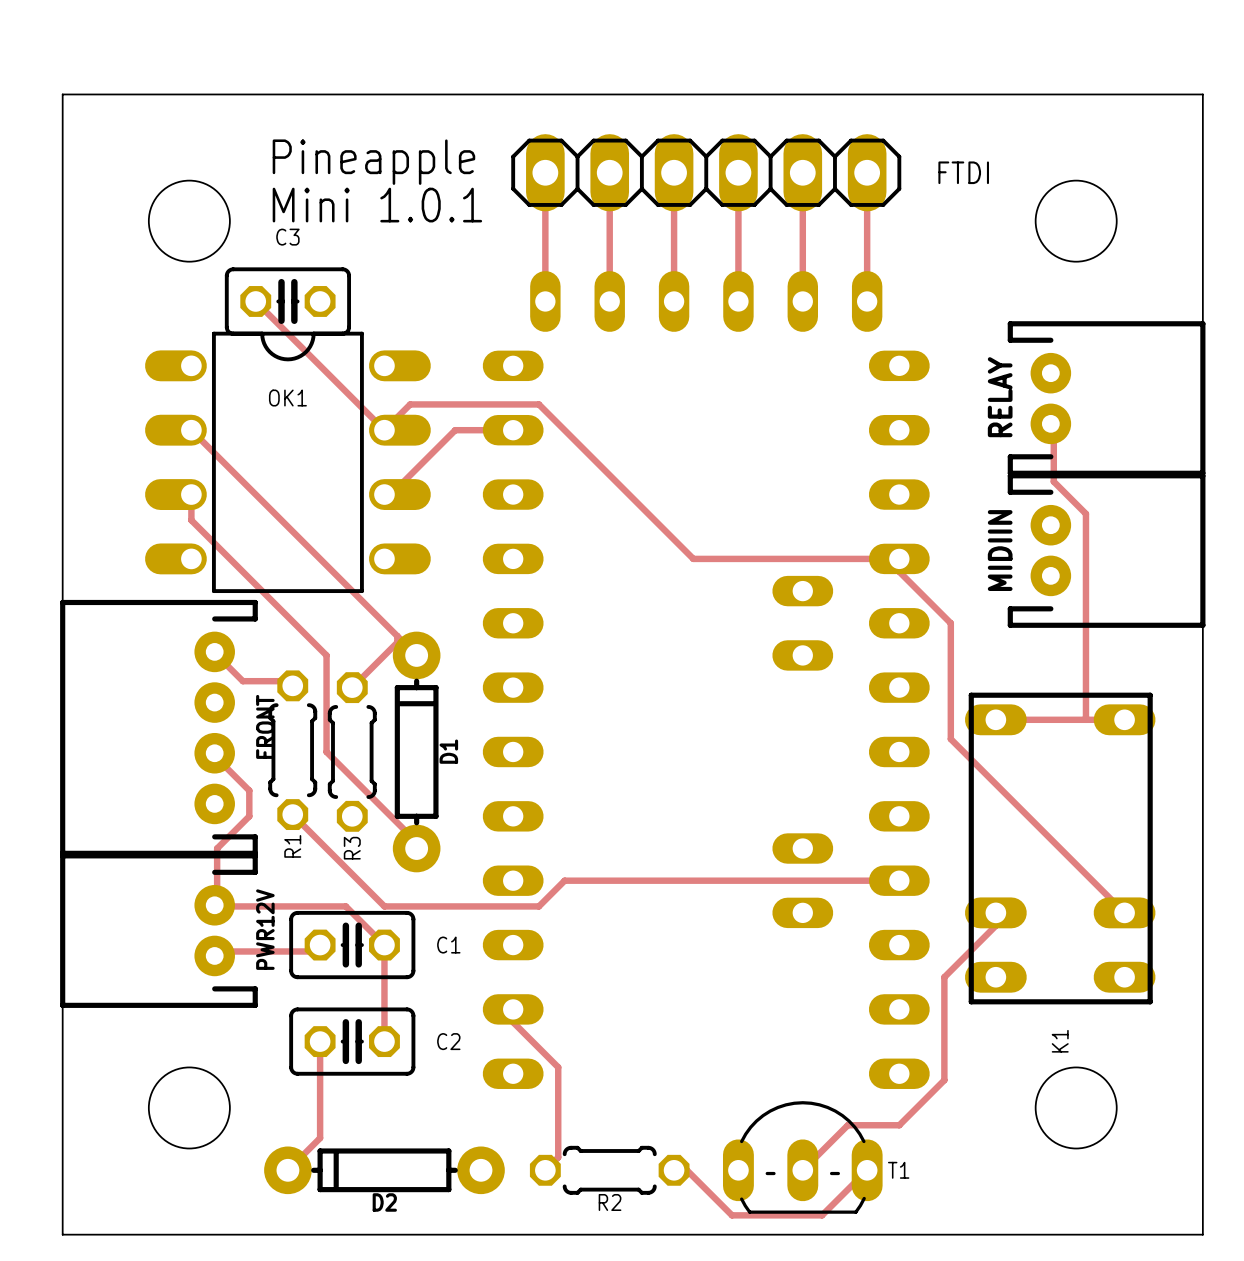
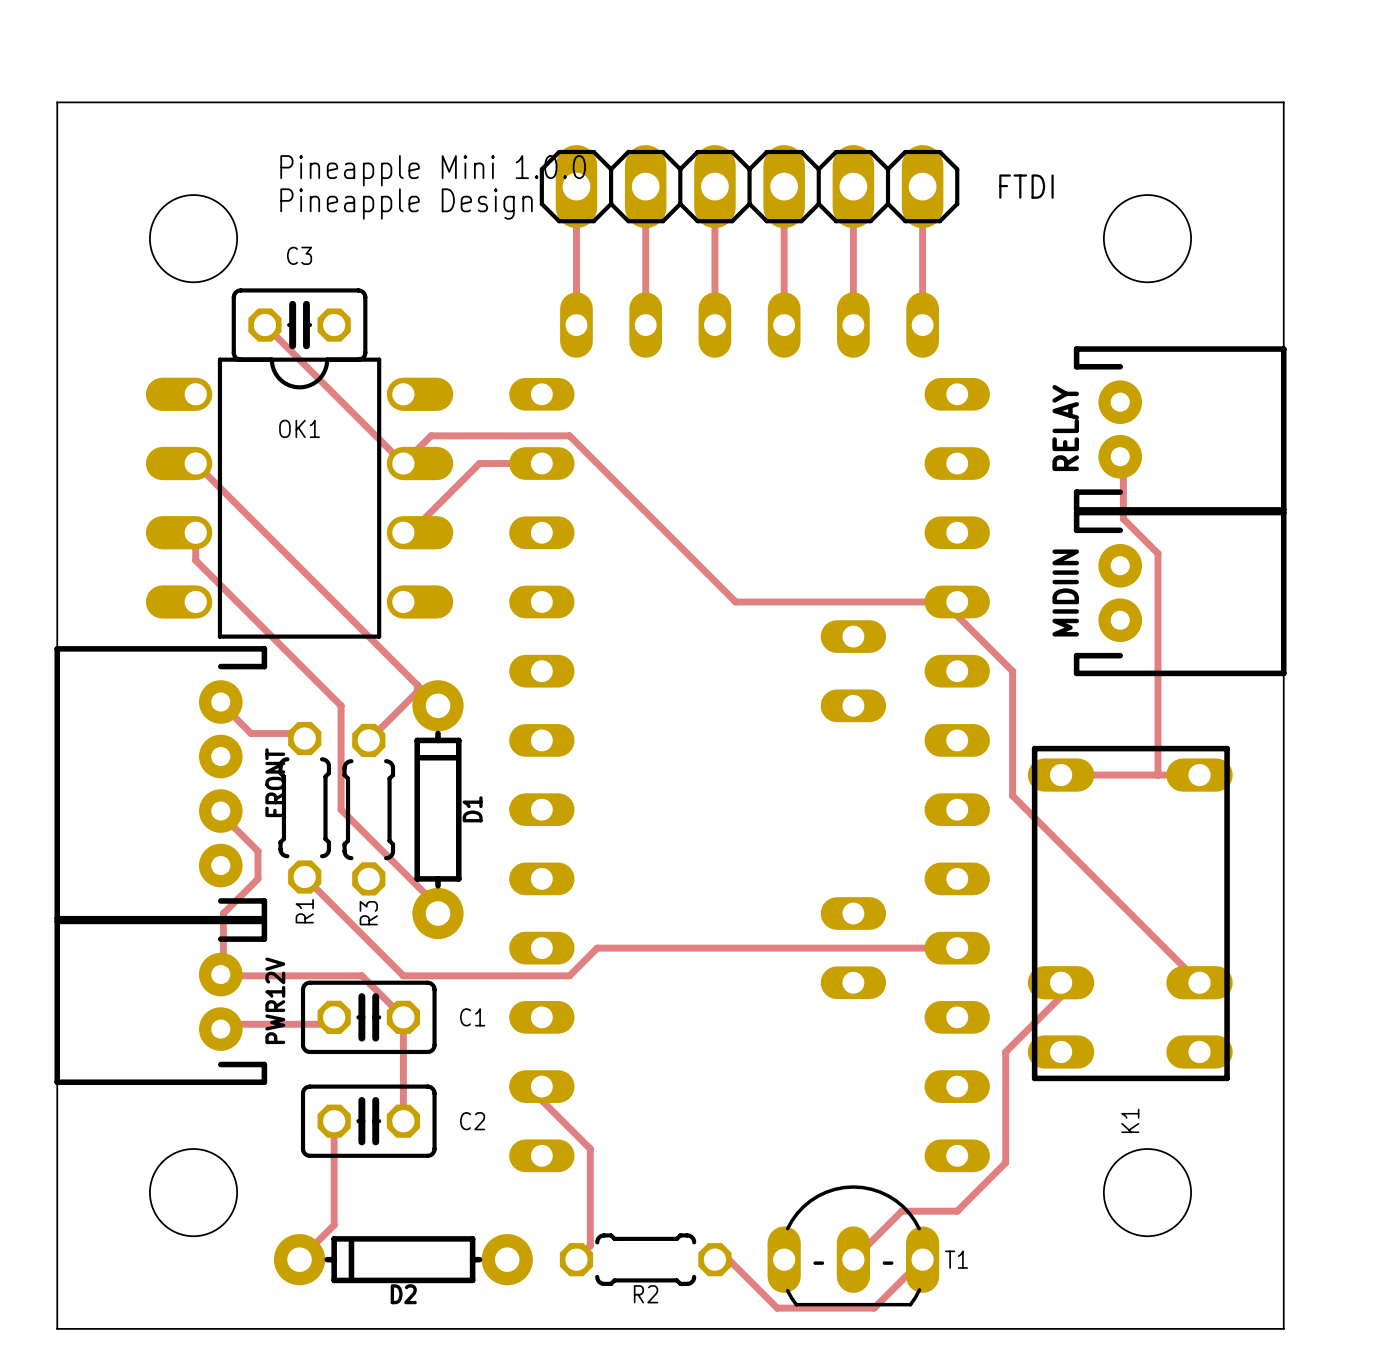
text: Pineapple (373, 162) -> Pineapple Mini 1.0.0 (433, 170)
text: none -> Pineapple Design (406, 204)
text: Mini 1.0.1 (377, 205) -> none

